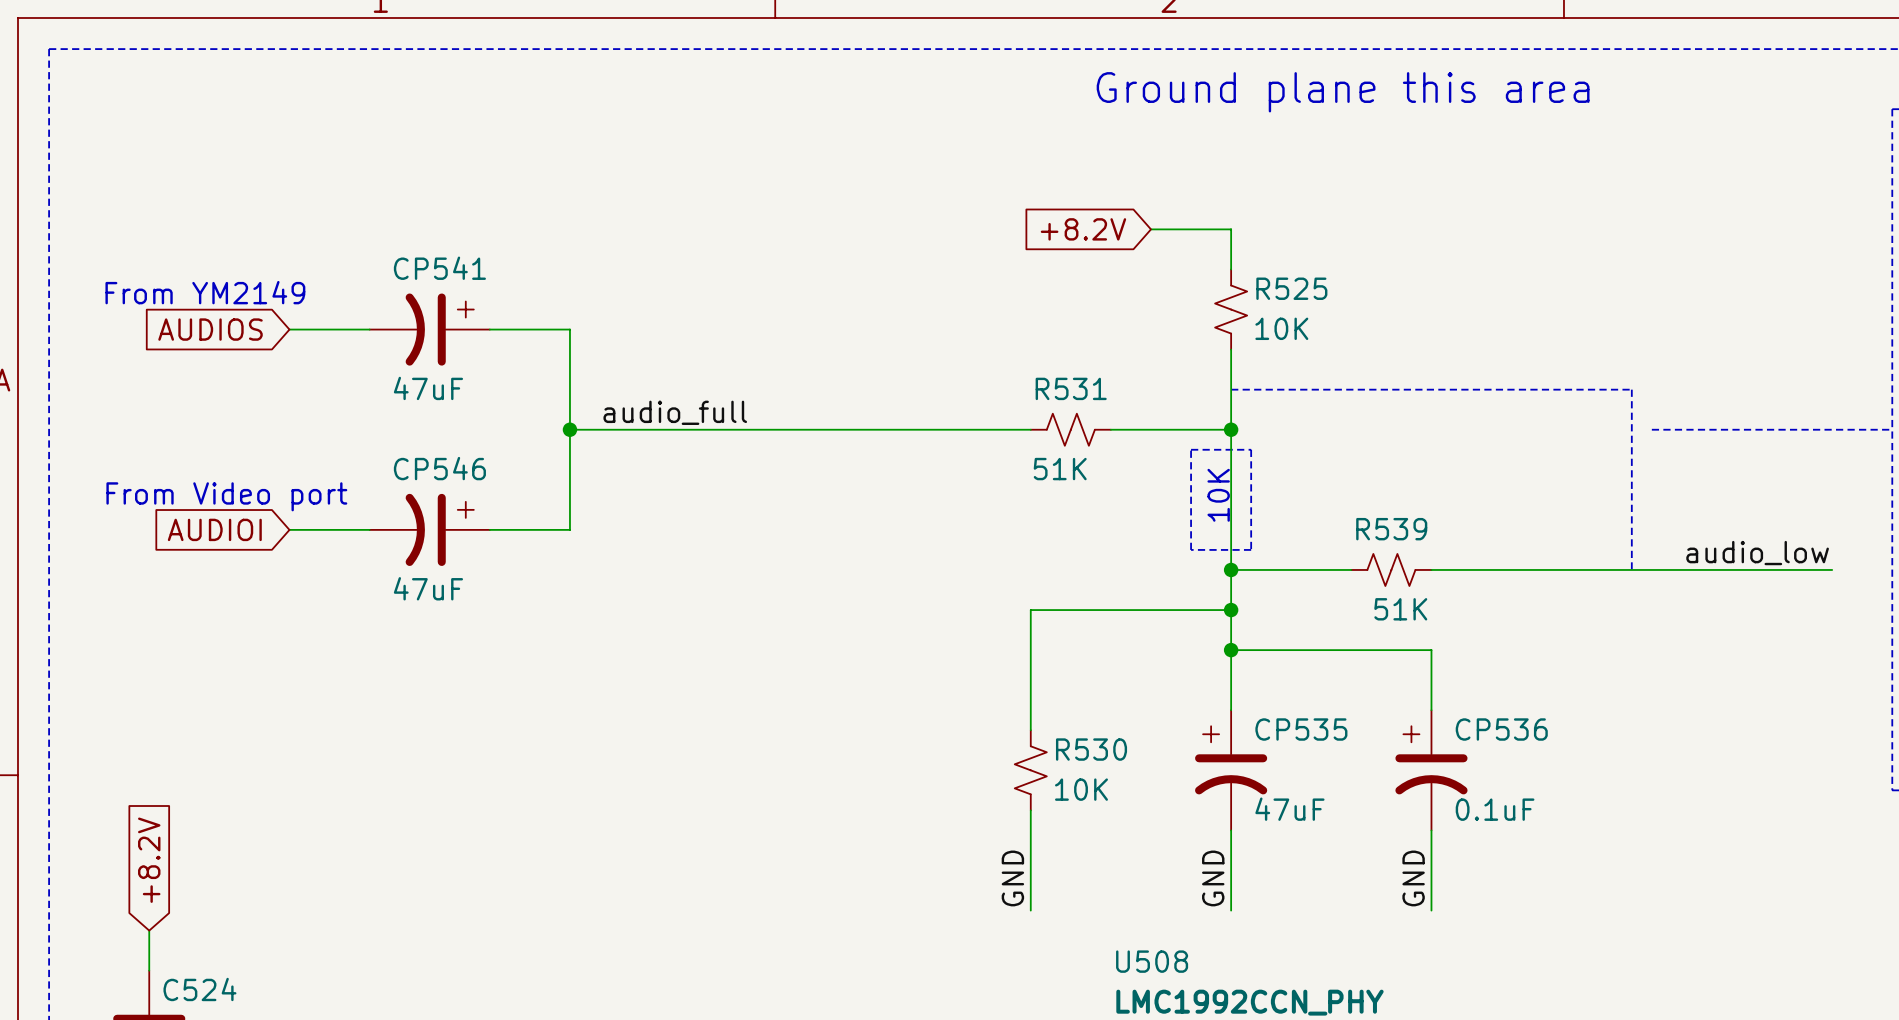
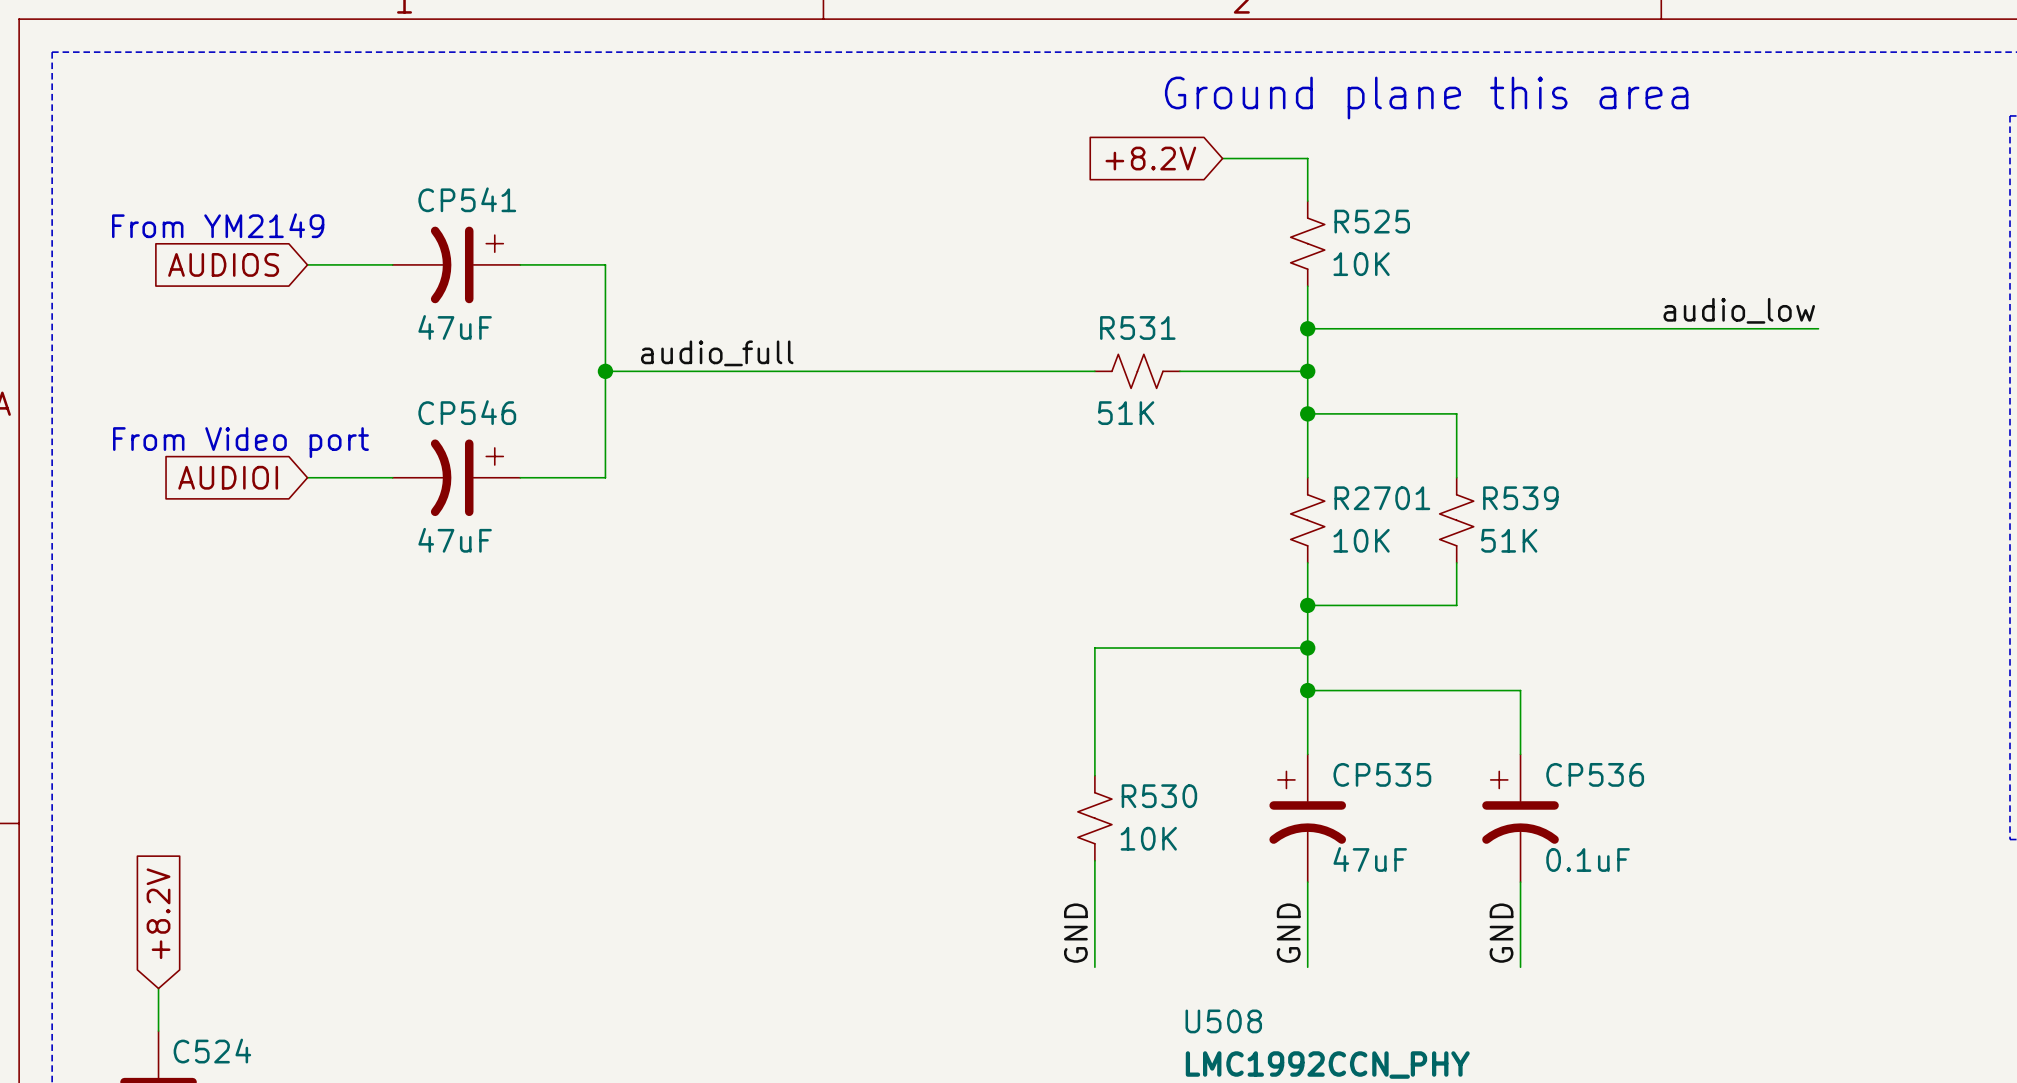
wire: none -> (1222, 158) (1307, 158) (1307, 201)
global label position: +8.2V (1083, 229) -> +8.2V (1150, 158)
wire: (1150, 229) (1231, 229) (1231, 269) -> (1180, 371) (1307, 371) (1307, 286)
text position: From YM2149 (205, 292) -> From YM2149 (218, 225)
wire: none -> (1307, 328) (1818, 328)
R525 position: (1231, 309) -> (1307, 243)
junction: none -> (1307, 328)
global label position: AUDIOS (210, 329) -> AUDIOS (223, 264)
wire: (289, 329) (369, 329) -> (307, 264) (392, 264)
CP541 position: (429, 329) -> (456, 264)
wire: (489, 329) (569, 329) -> (520, 264) (605, 264) (605, 350)
junction: none -> (1307, 371)
wire: none -> (1307, 413) (1456, 413) (1456, 477)
line: (1231, 389) (1631, 389) (1631, 569) -> none
junction: none -> (1307, 413)
label position: audio_full (675, 412) -> audio_full (717, 353)
wire: (569, 429) (1030, 429) -> (605, 371) (1094, 371)
junction position: (569, 429) -> (605, 371)
R531 position: (1070, 429) -> (1137, 371)
wire: (1110, 429) (1231, 429) -> none
junction: (1231, 429) -> none
line: (1651, 429) (1892, 429) -> none
wire: (569, 449) (569, 529) (489, 529) -> (605, 477) (520, 477)
line: (1191, 449) (1251, 449) (1251, 549) (1191, 549) (1191, 449) -> none
R2701: none -> 10K (1307, 520)
text: 10K (1218, 495) -> none
text position: From Video port (226, 496) -> From Video port (240, 442)
global label position: AUDIOI (214, 529) -> AUDIOI (228, 477)
wire: (289, 529) (369, 529) -> (307, 477) (392, 477)
CP546 position: (429, 529) -> (456, 477)
wire: none -> (1456, 562) (1456, 605) (1435, 605)
label position: audio_low (1757, 553) -> audio_low (1739, 310)
R539 rotation: 0° (1391, 569) -> 90° clockwise (1456, 520)
R539 position: (1391, 569) -> (1456, 520)
wire: (1431, 569) (1832, 569) -> none
R539 value position: 51K (1400, 609) -> 51K (1509, 540)

